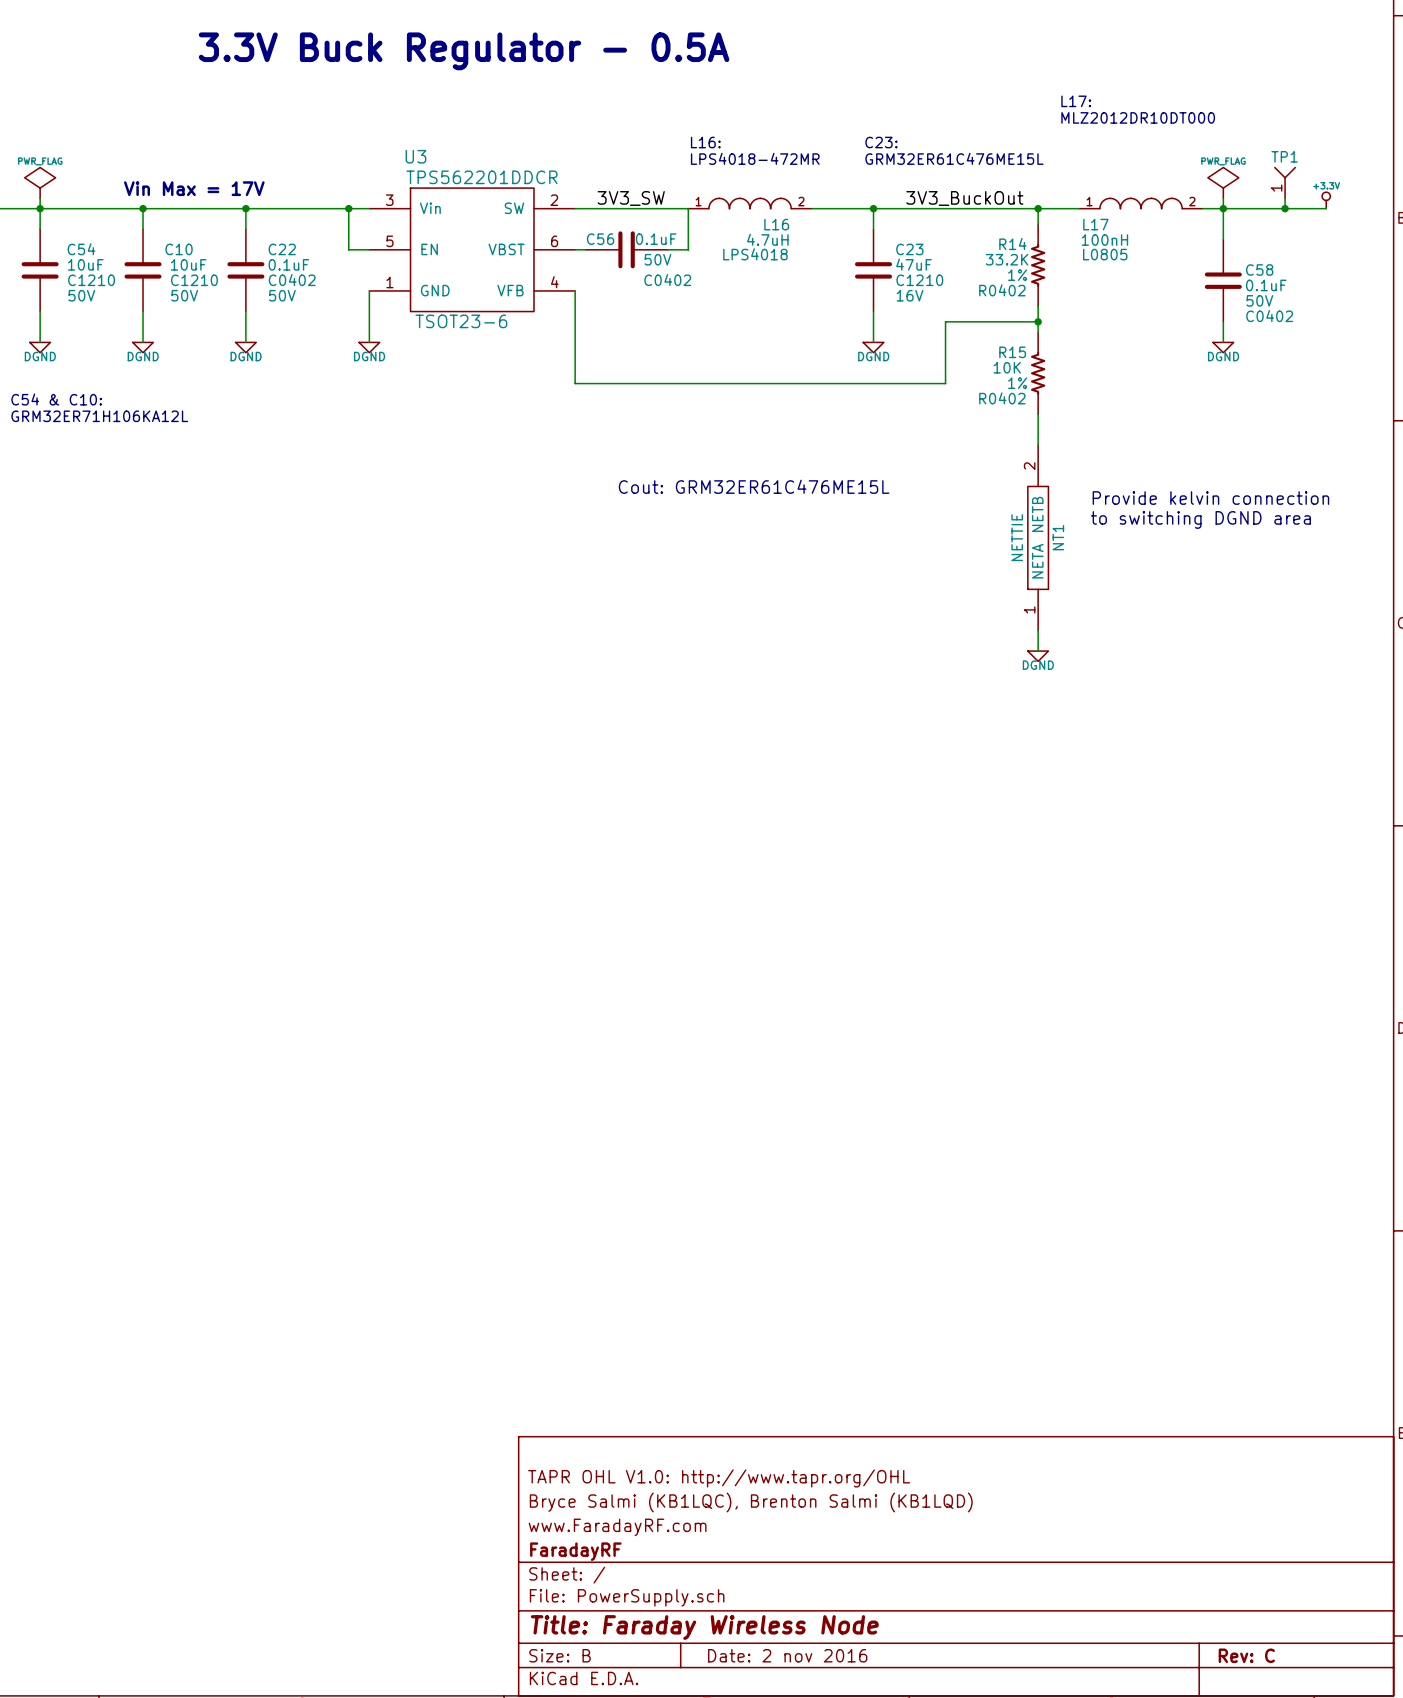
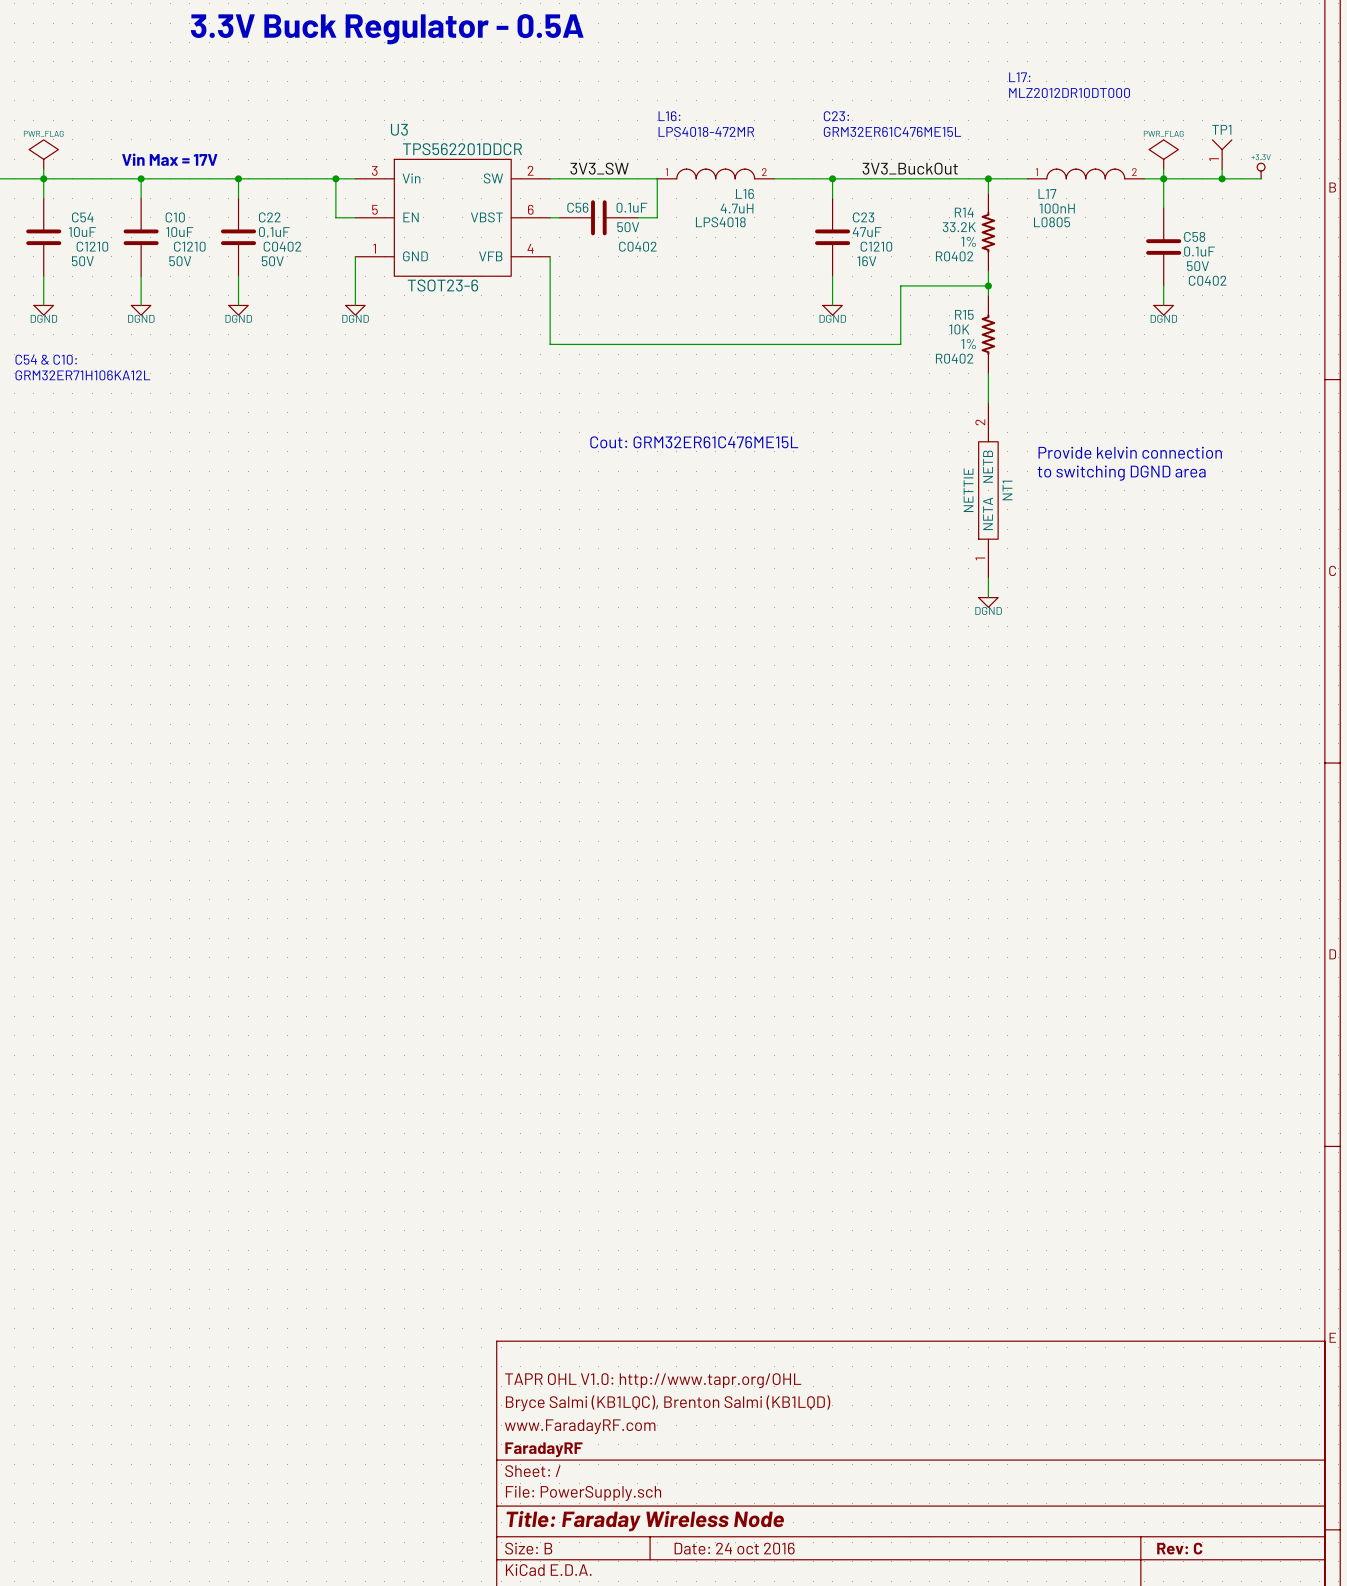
title block: Date: 2 nov 2016 (787, 1655) -> Date: 24 oct 2016 (734, 1548)

